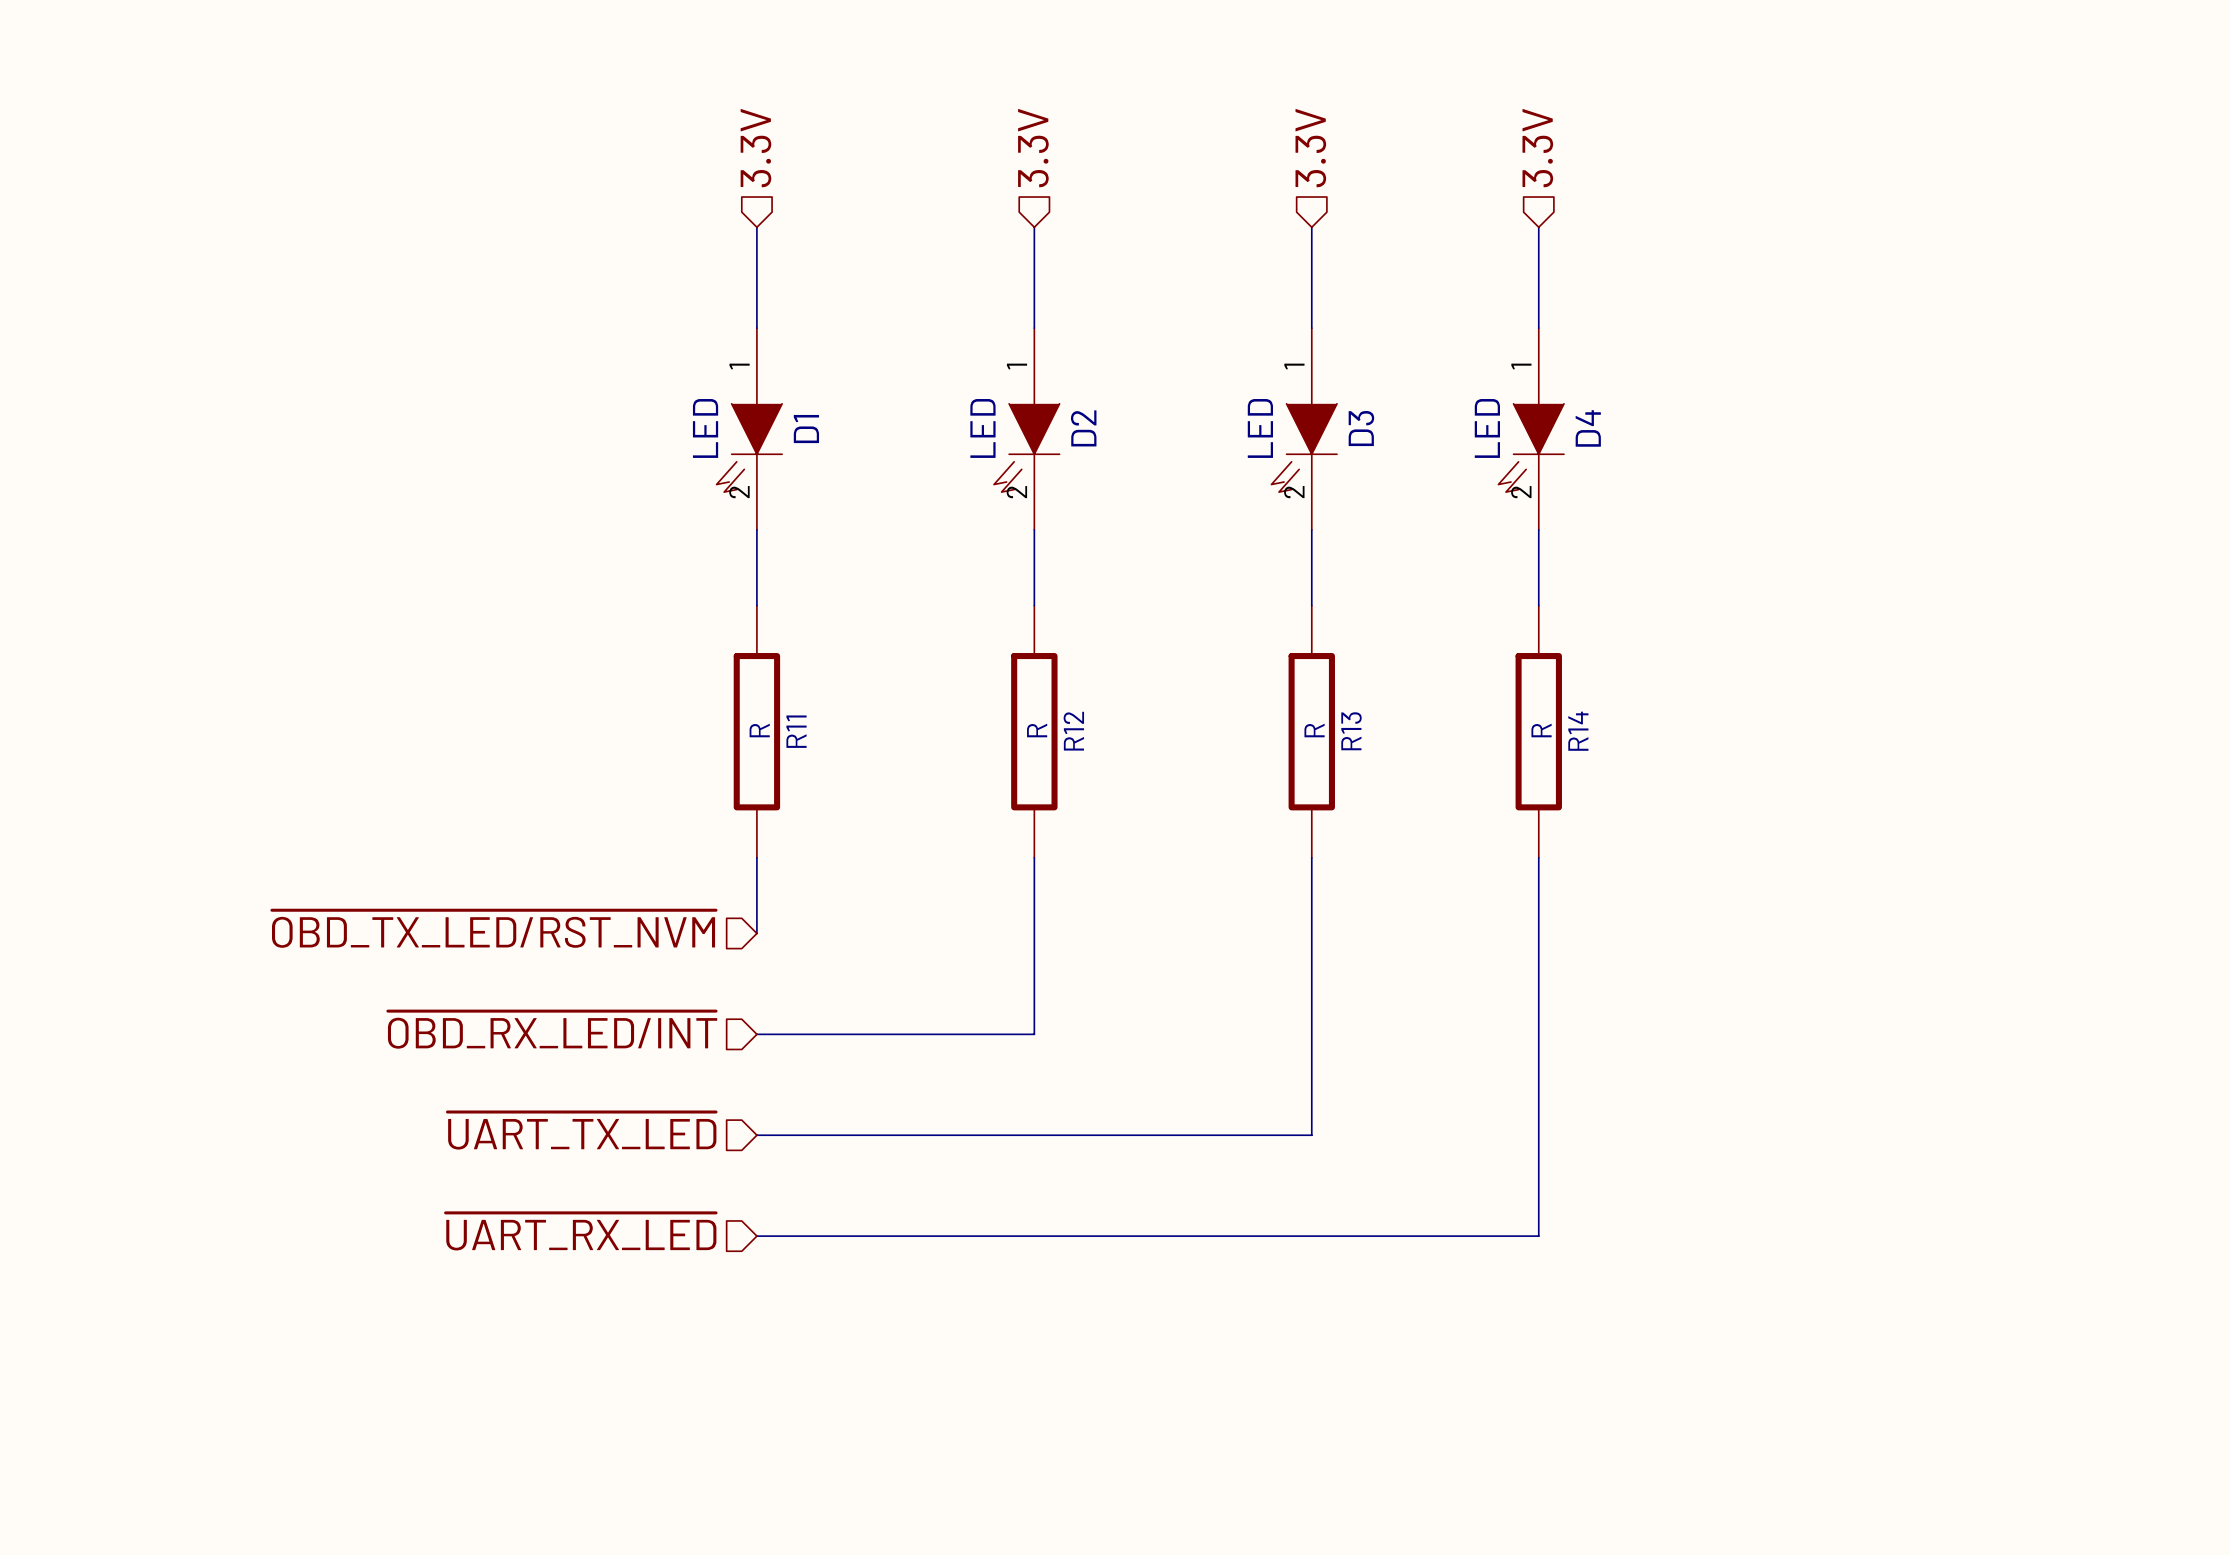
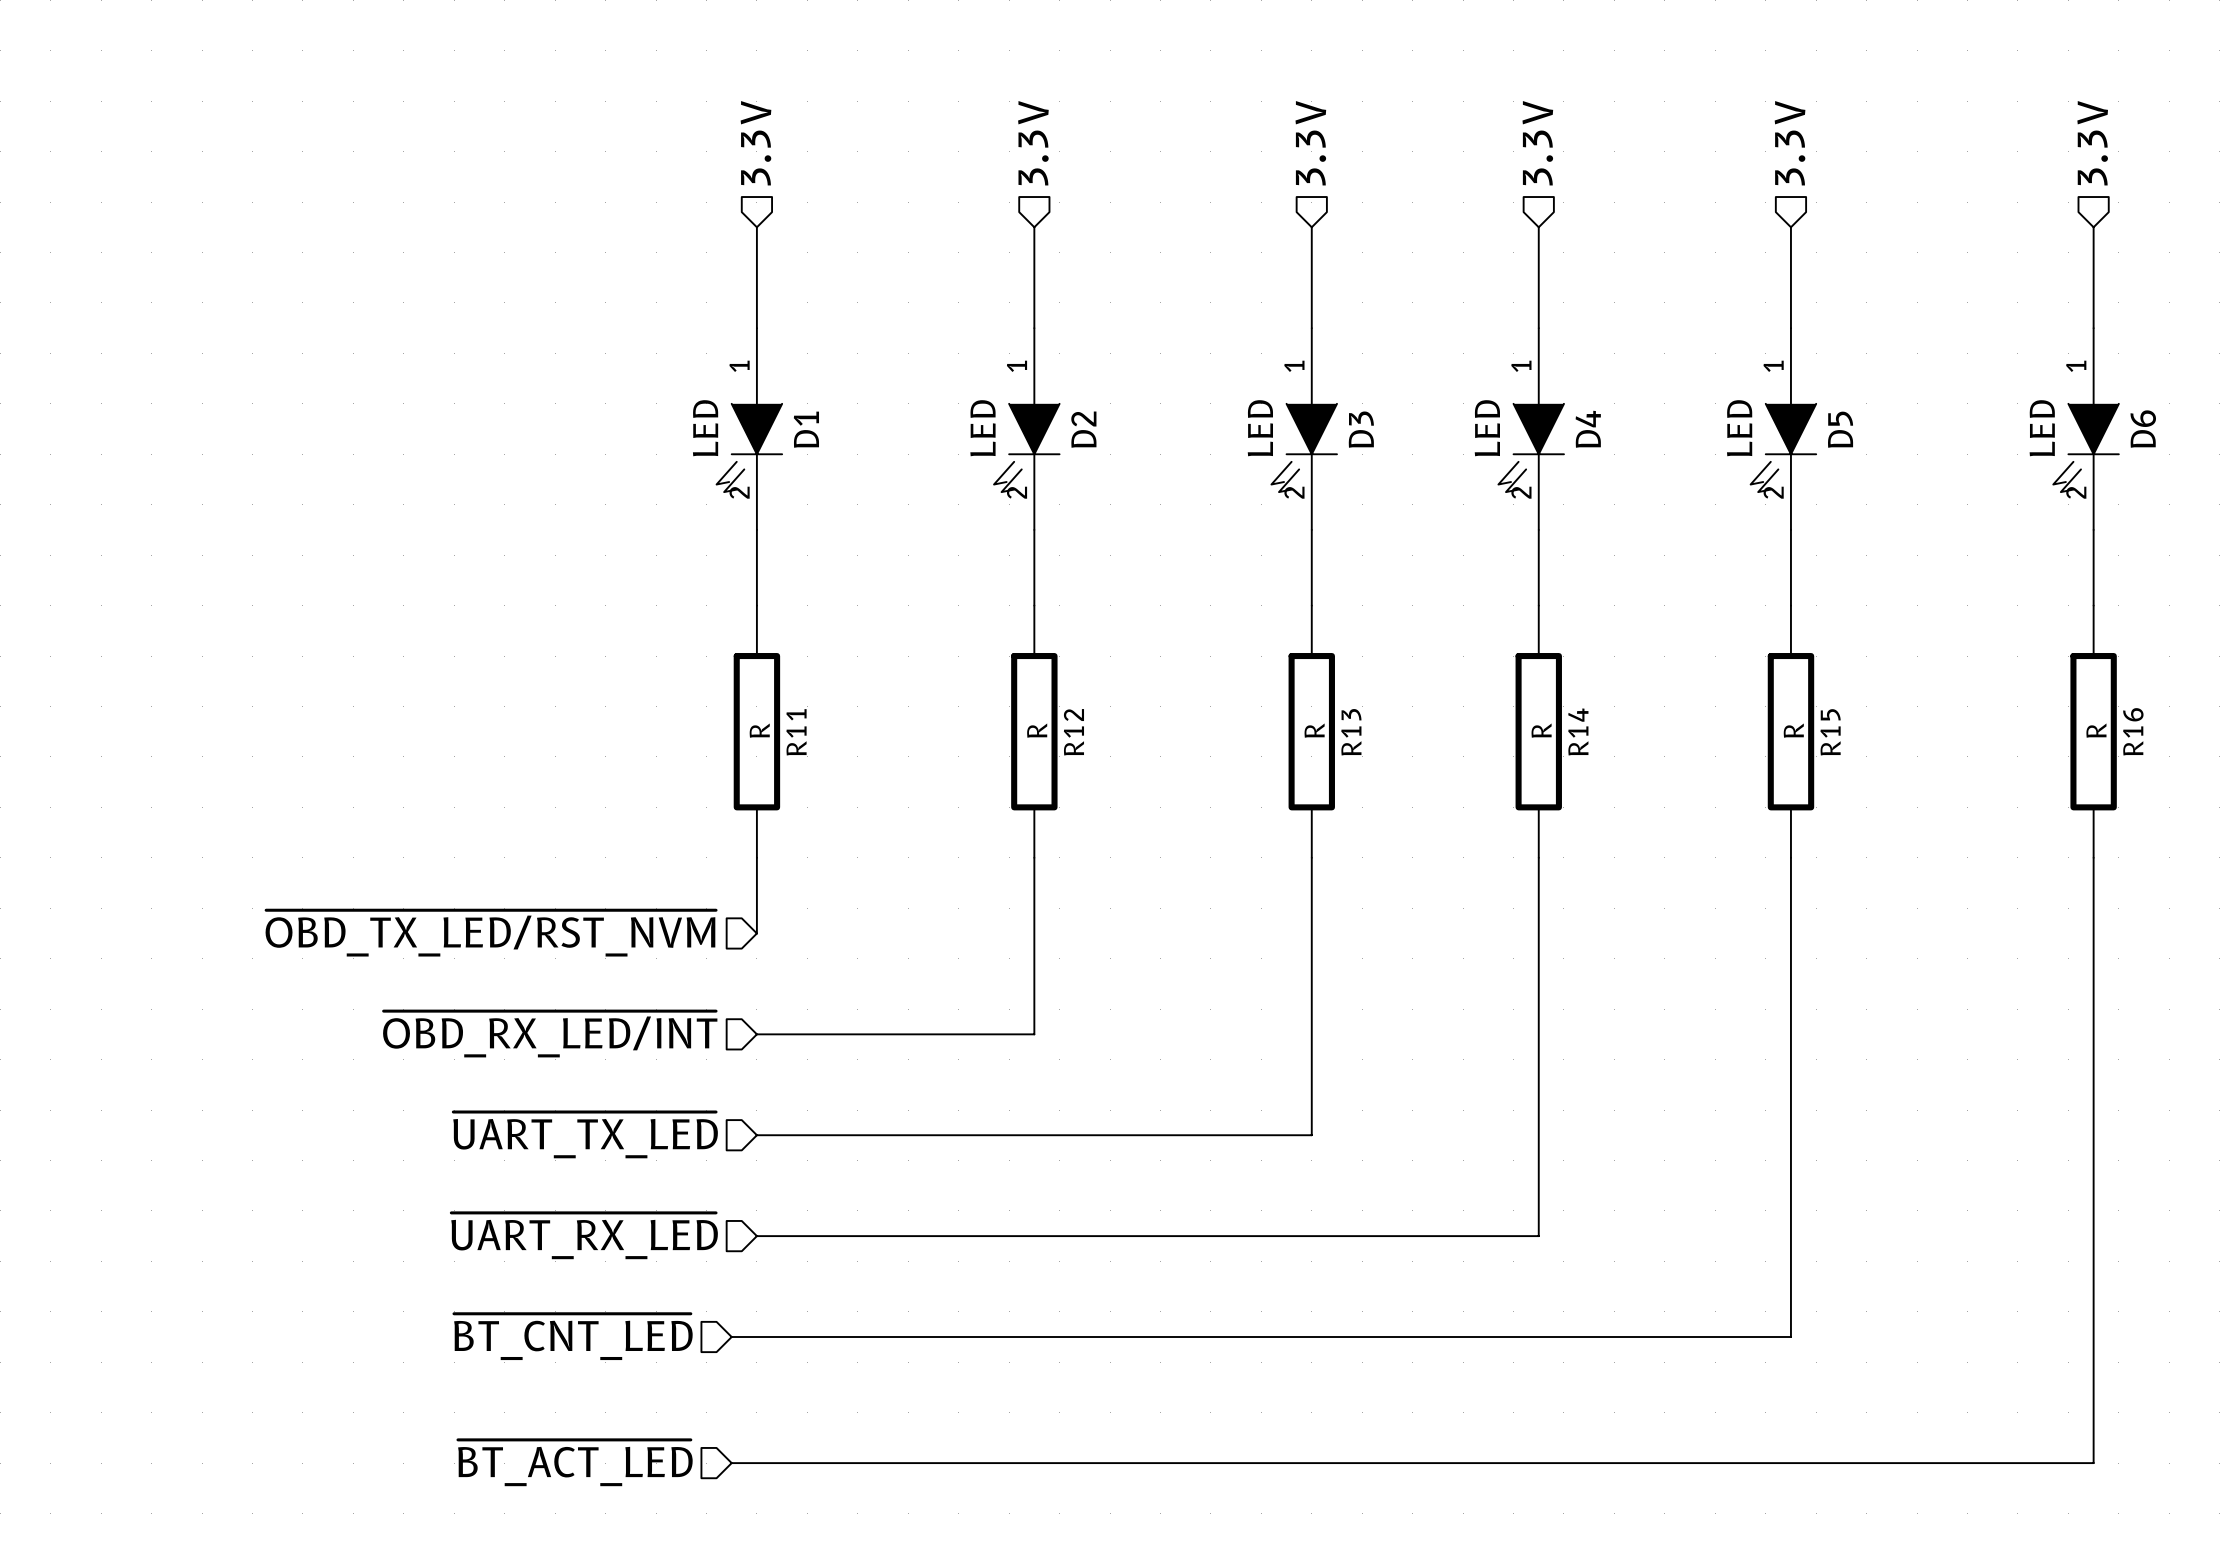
hierarchical label: none -> 3.3V (1790, 143)
hierarchical label: none -> 3.3V (2092, 143)
wire: none -> (1790, 227) (1790, 328)
wire: none -> (2093, 227) (2093, 328)
D5: none -> LED (1783, 429)
D6: none -> LED (2086, 429)
wire: none -> (1790, 529) (1790, 605)
wire: none -> (2093, 529) (2093, 605)
R15: none -> R (1790, 731)
R16: none -> R (2093, 731)
wire: none -> (1790, 857) (1790, 1337) (731, 1337)
wire: none -> (2093, 857) (2093, 1463) (731, 1463)
hierarchical label: none -> ~{BT_CNT_LED} (573, 1336)
hierarchical label: none -> ~{BT_ACT_LED} (575, 1463)

